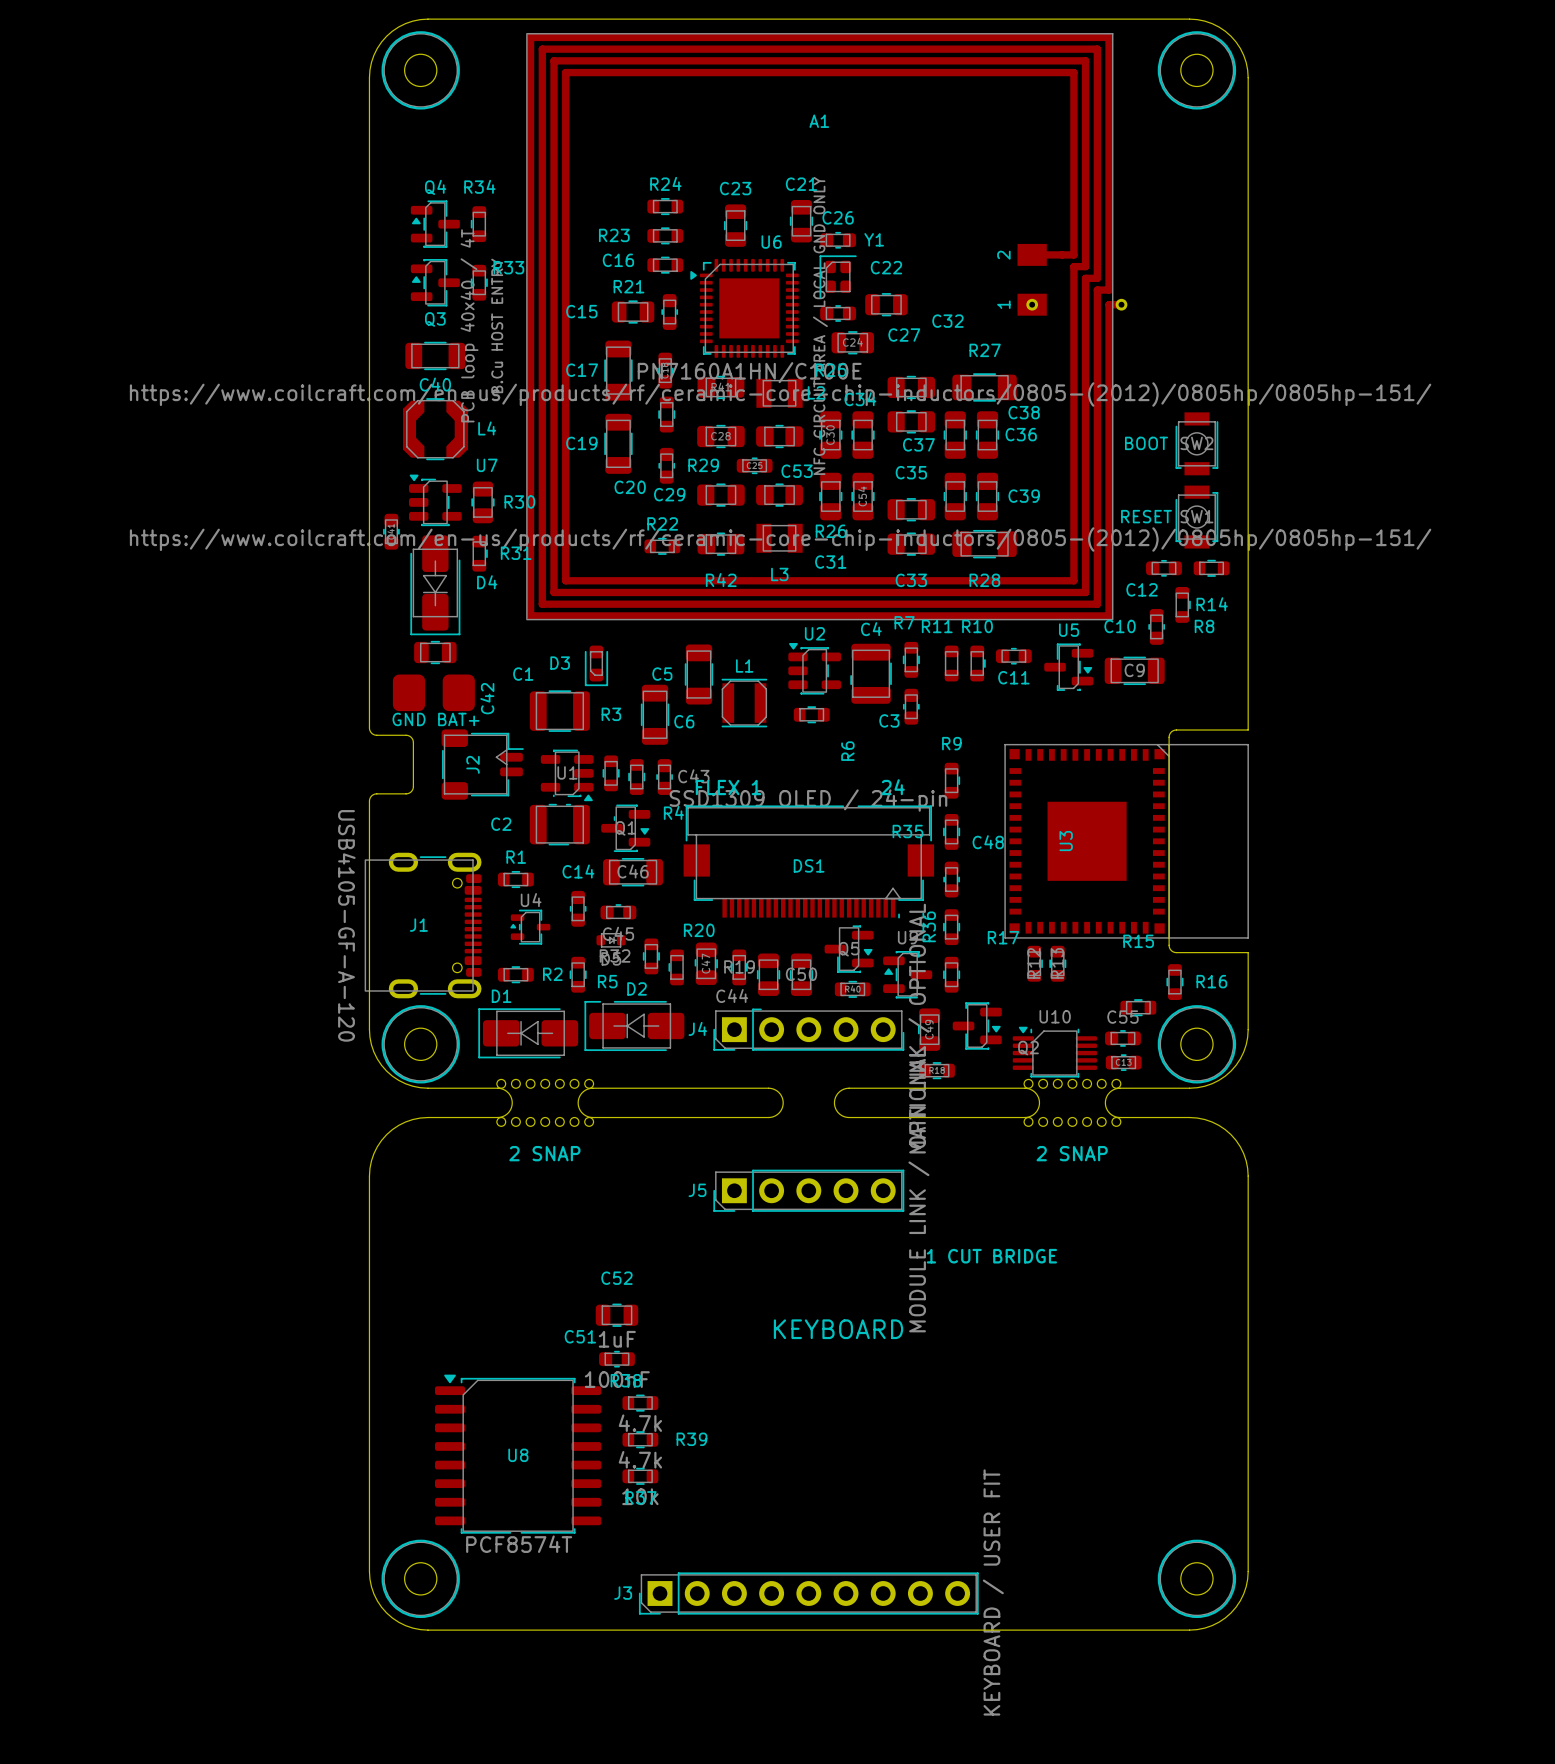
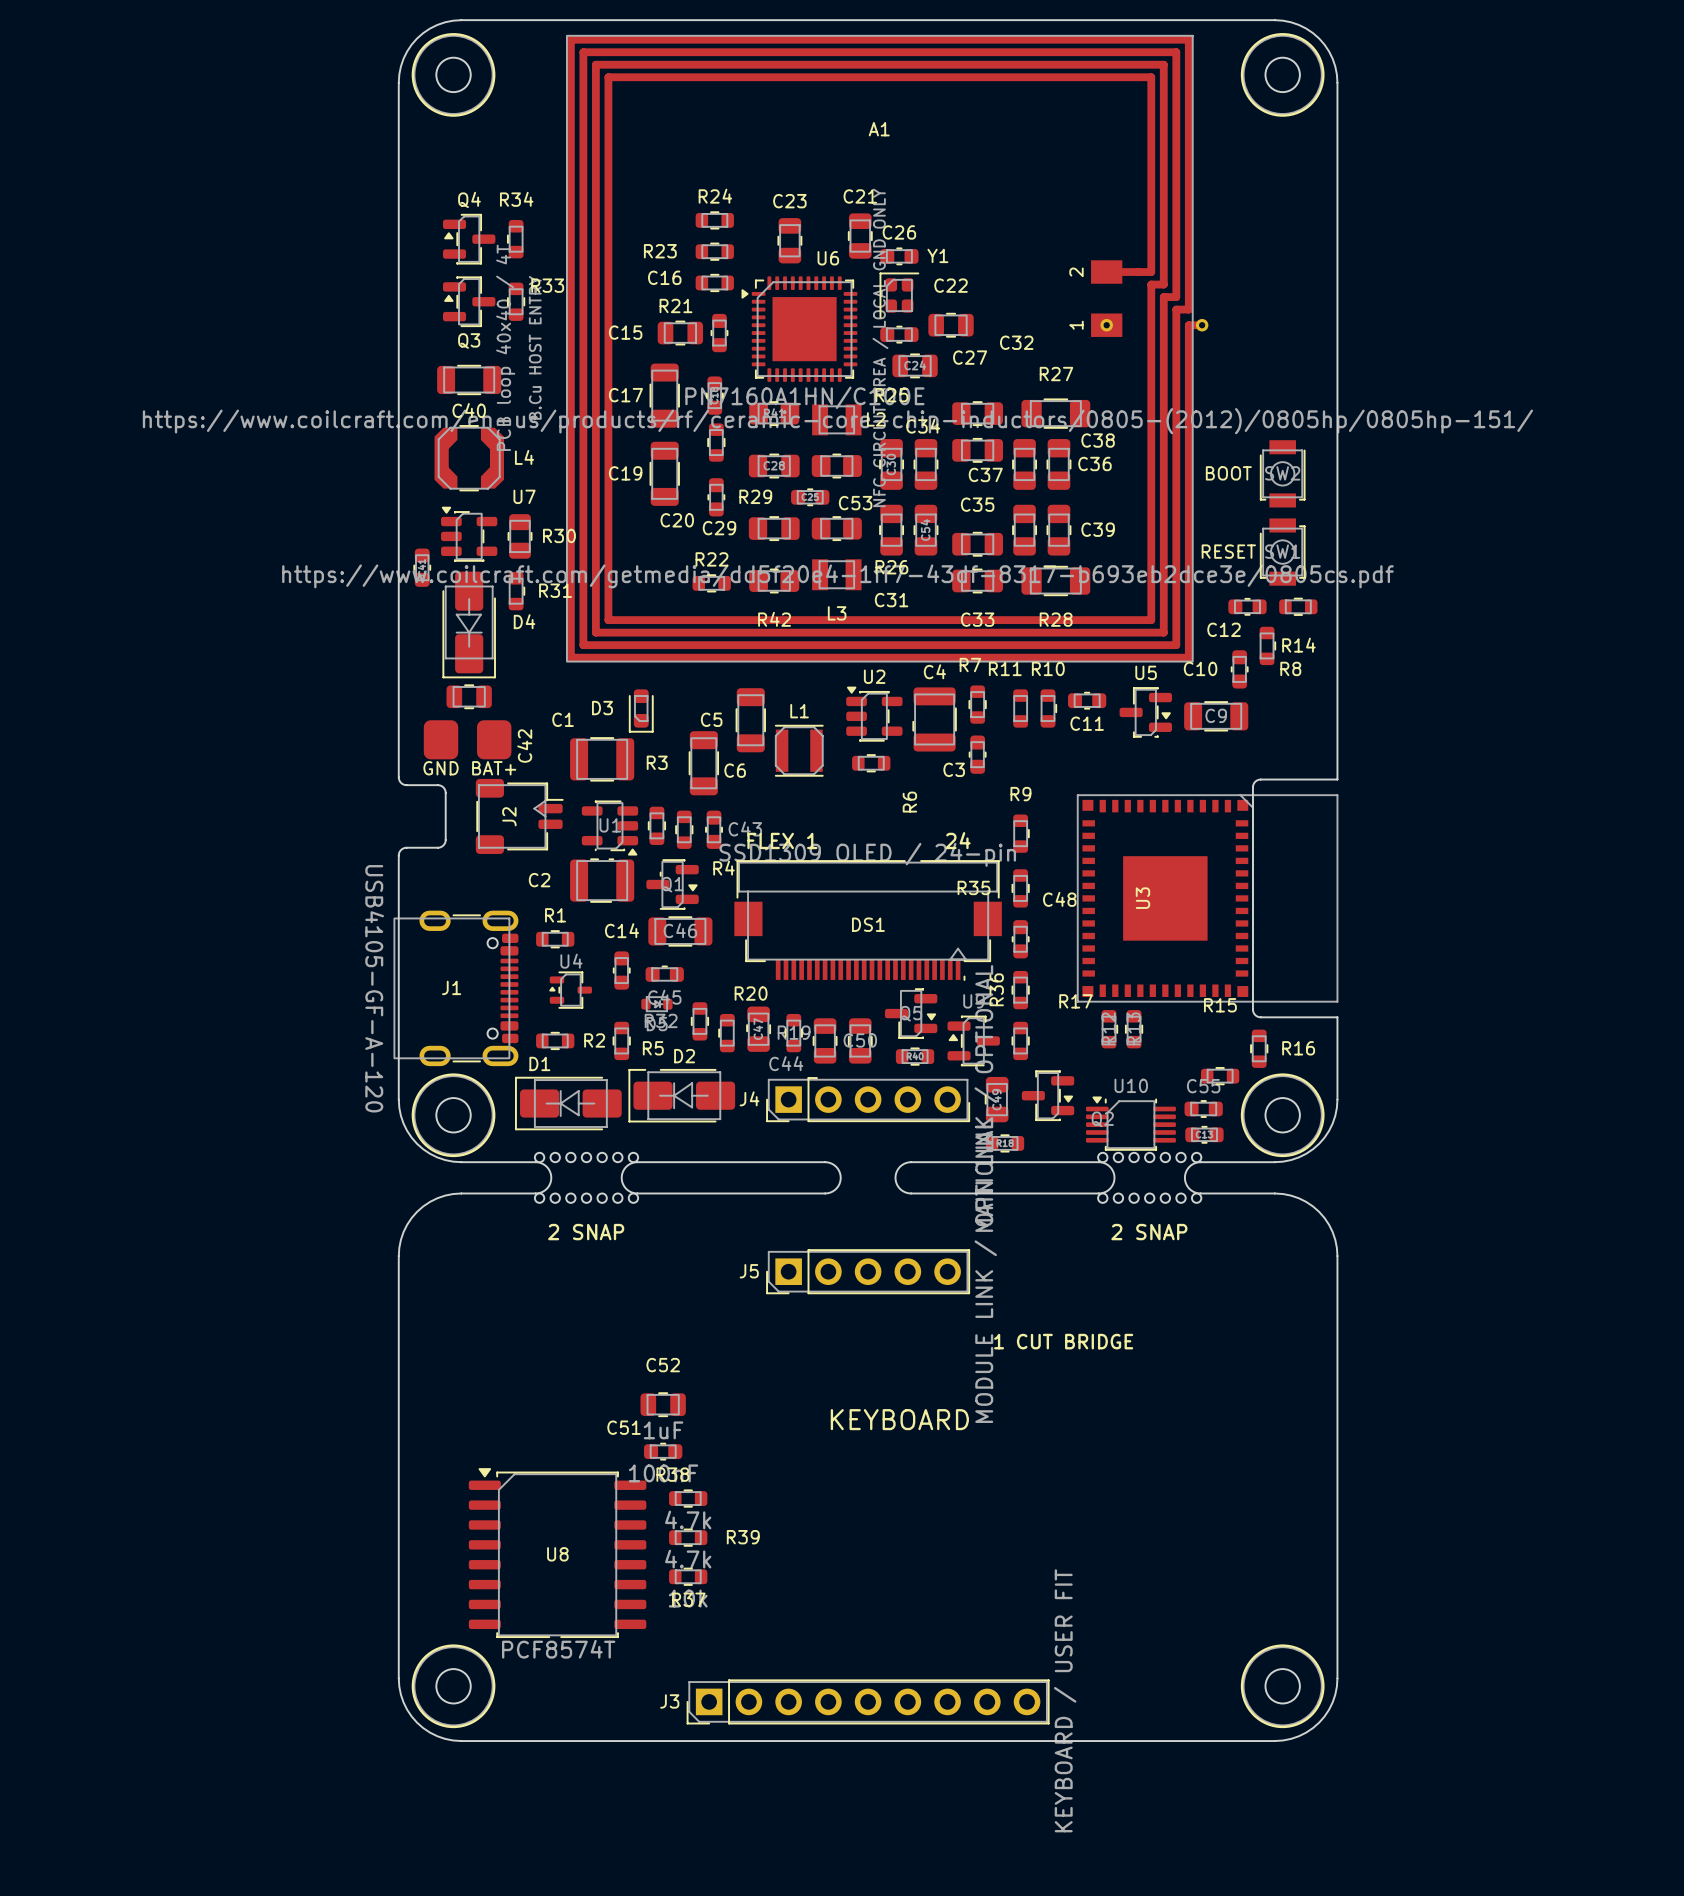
L3 text: https://www.coilcraft.com/en-us/products/rf/ceramic-core-chip-inductors/0805-(2012)/0805hp/0805hp-151/ (780, 539) -> https://www.coilcraft.com/getmedia/dd5f20e4-1ff7-43df-8317-b693eb2dce3e/0805cs.pdf (837, 576)

